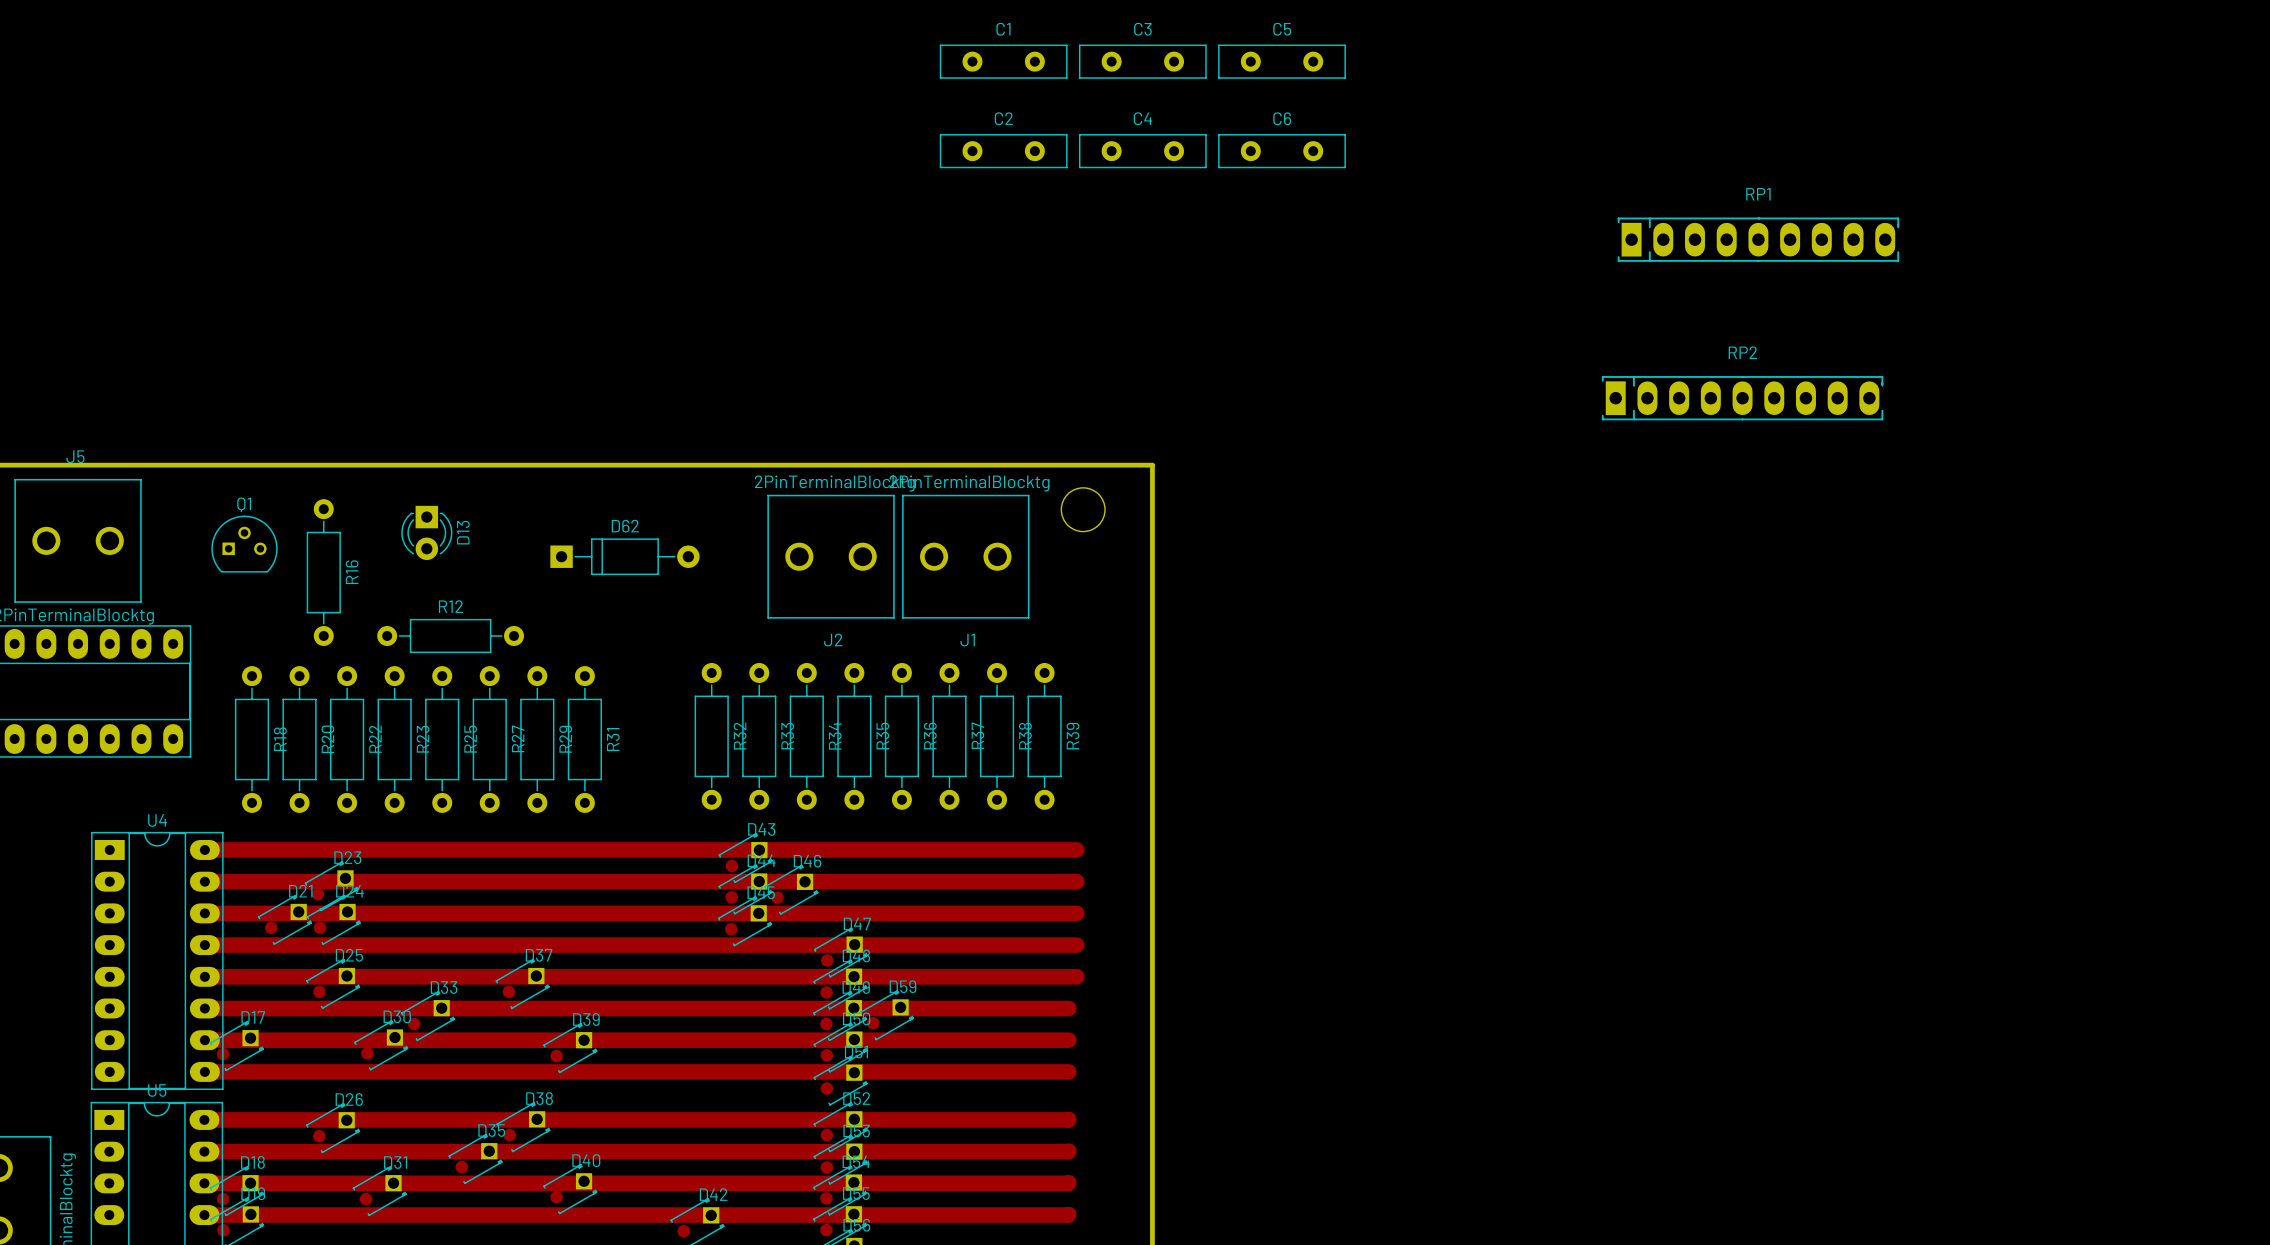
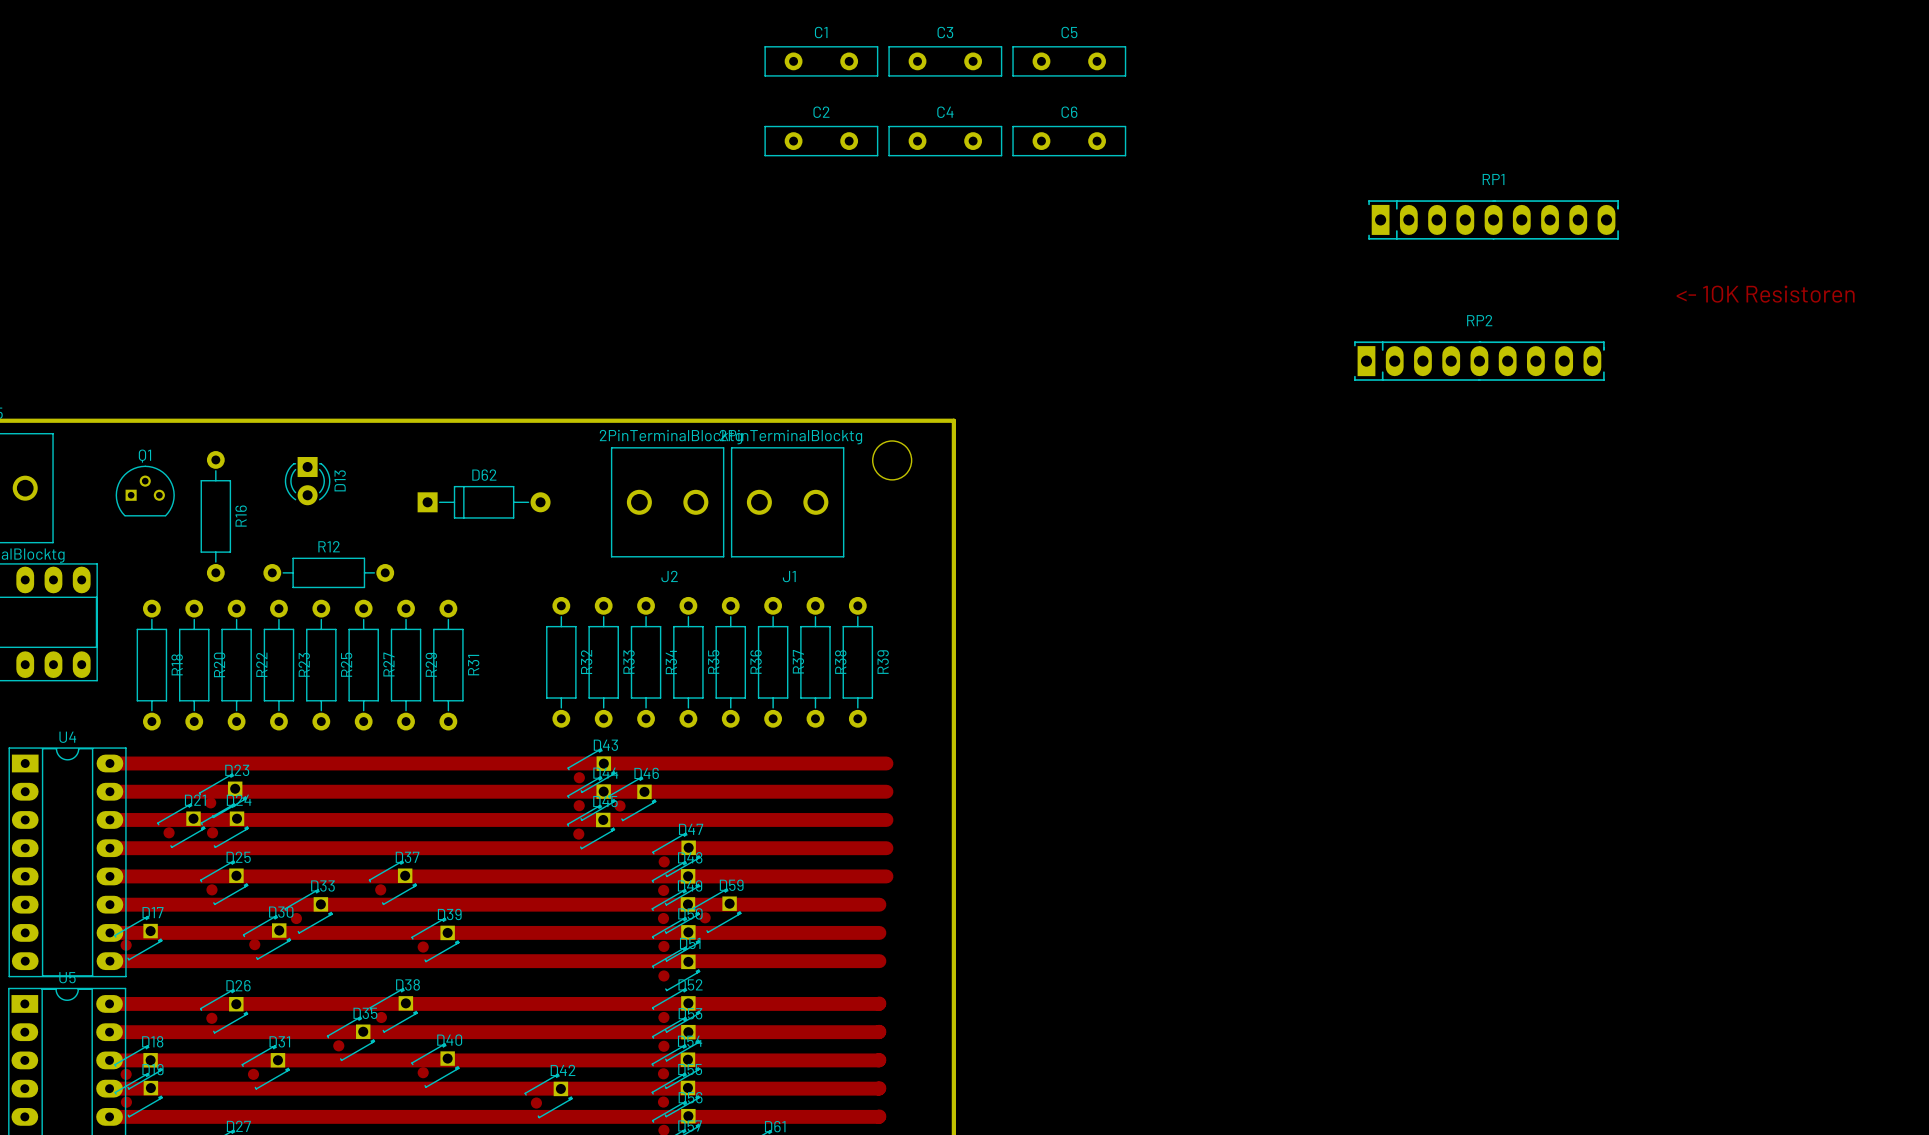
text: none -> <- 1OK Resistoren (1765, 294)

